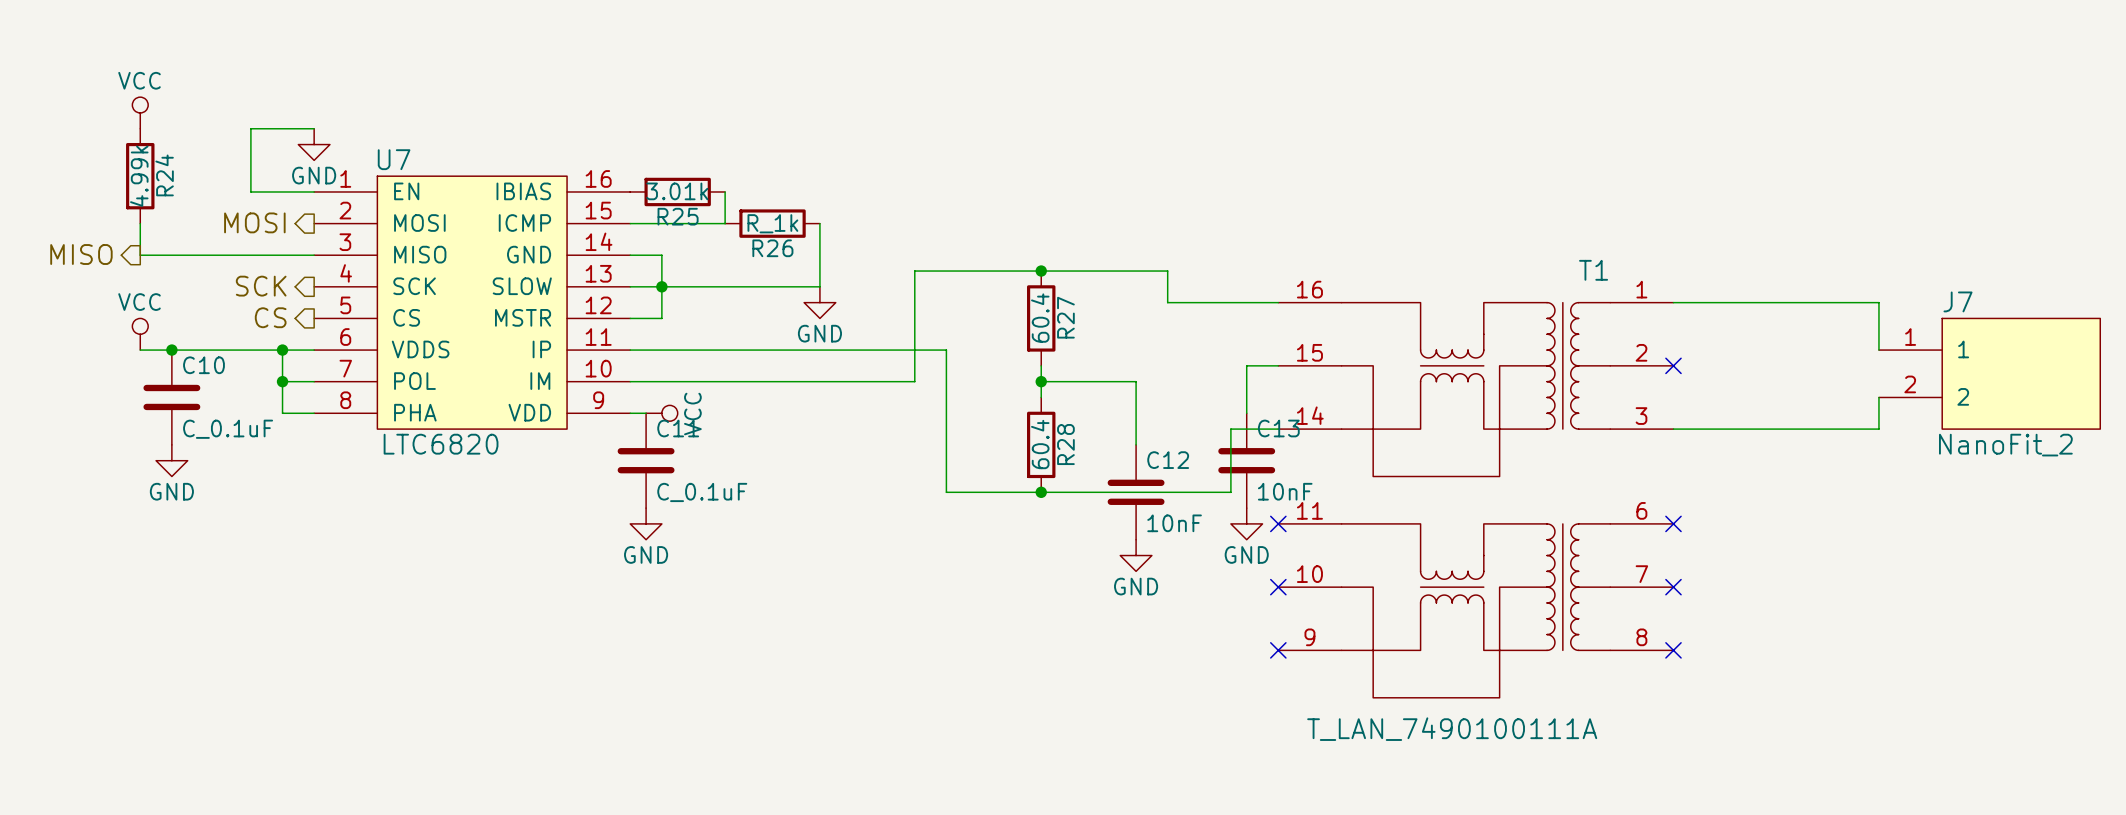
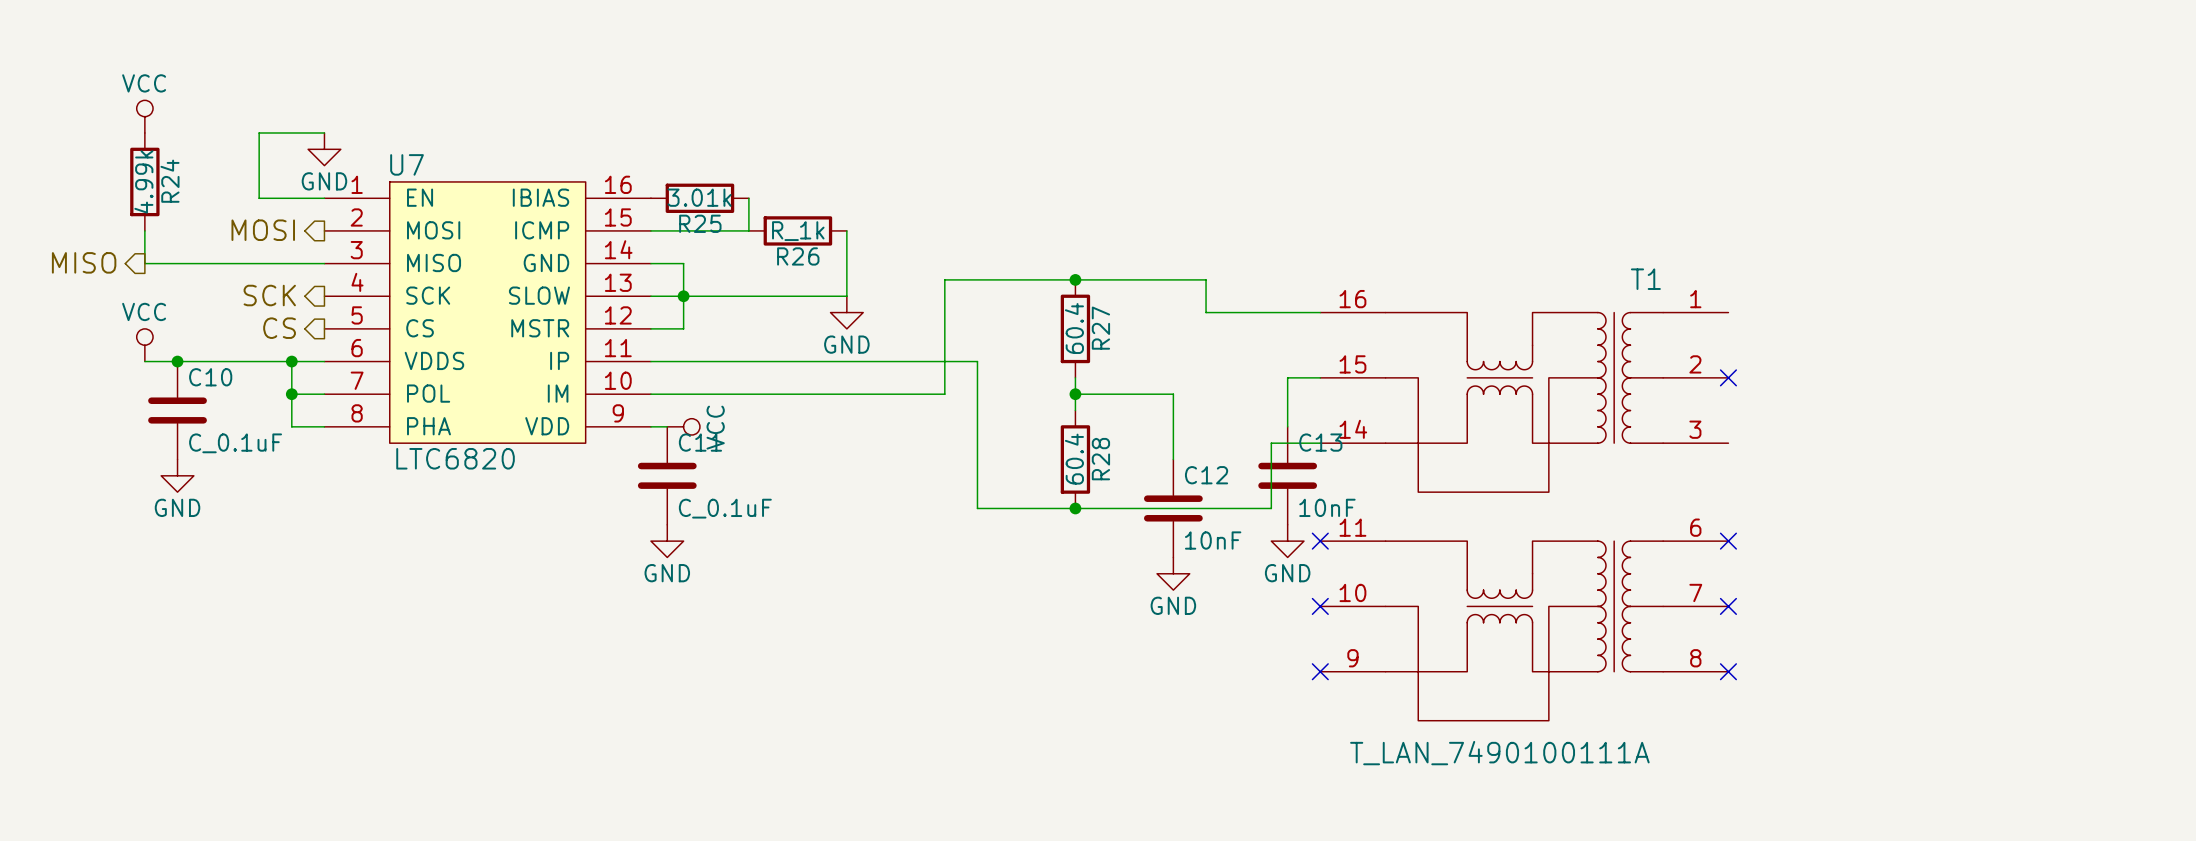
wire: (1673, 302) (1878, 302) (1878, 350) -> none
J7: NanoFit_2 (1989, 373) -> none
wire: (1878, 397) (1878, 429) (1673, 429) -> none

